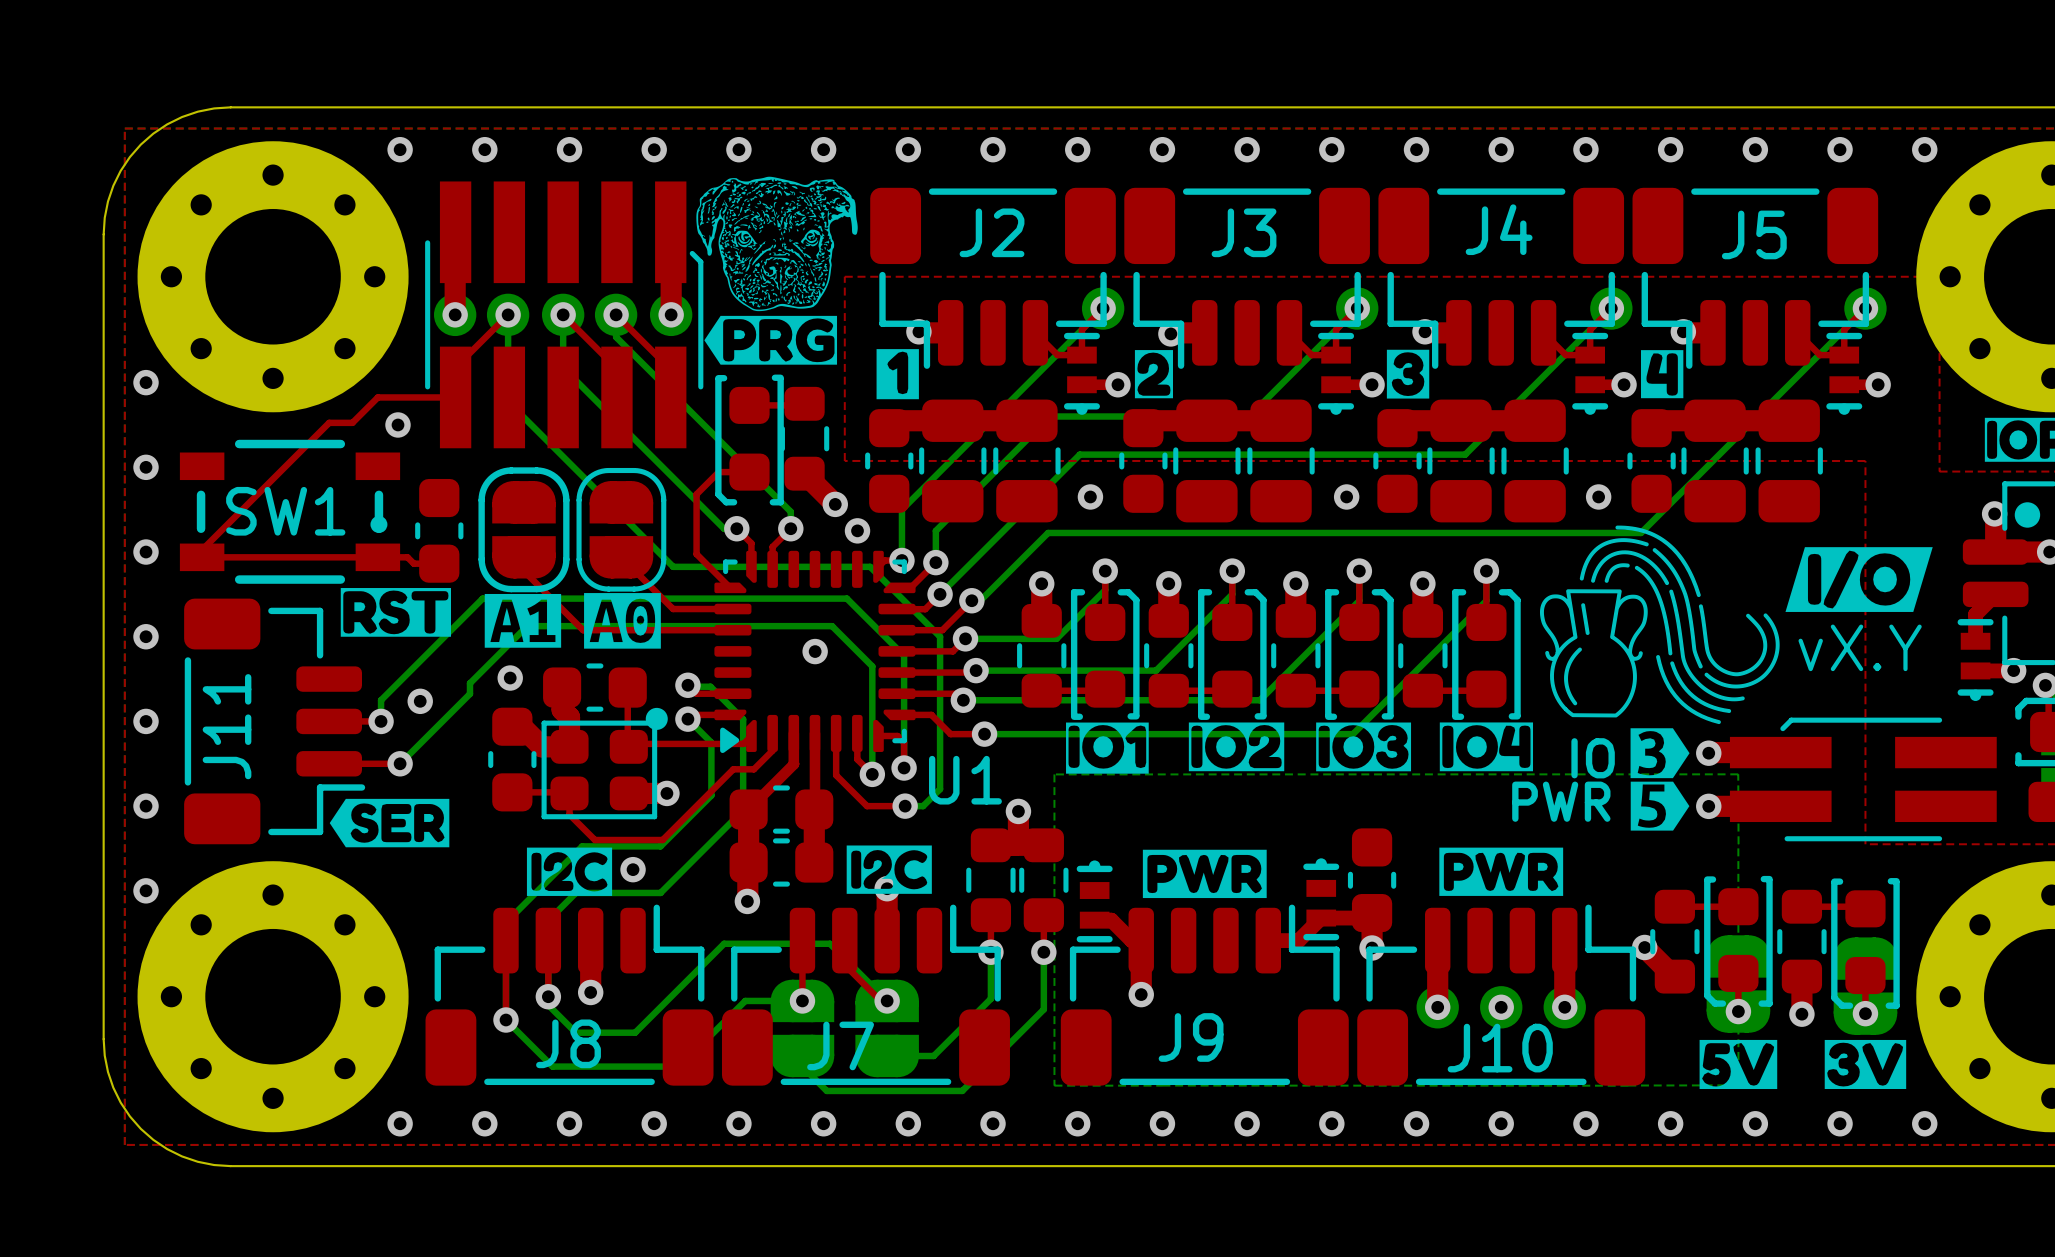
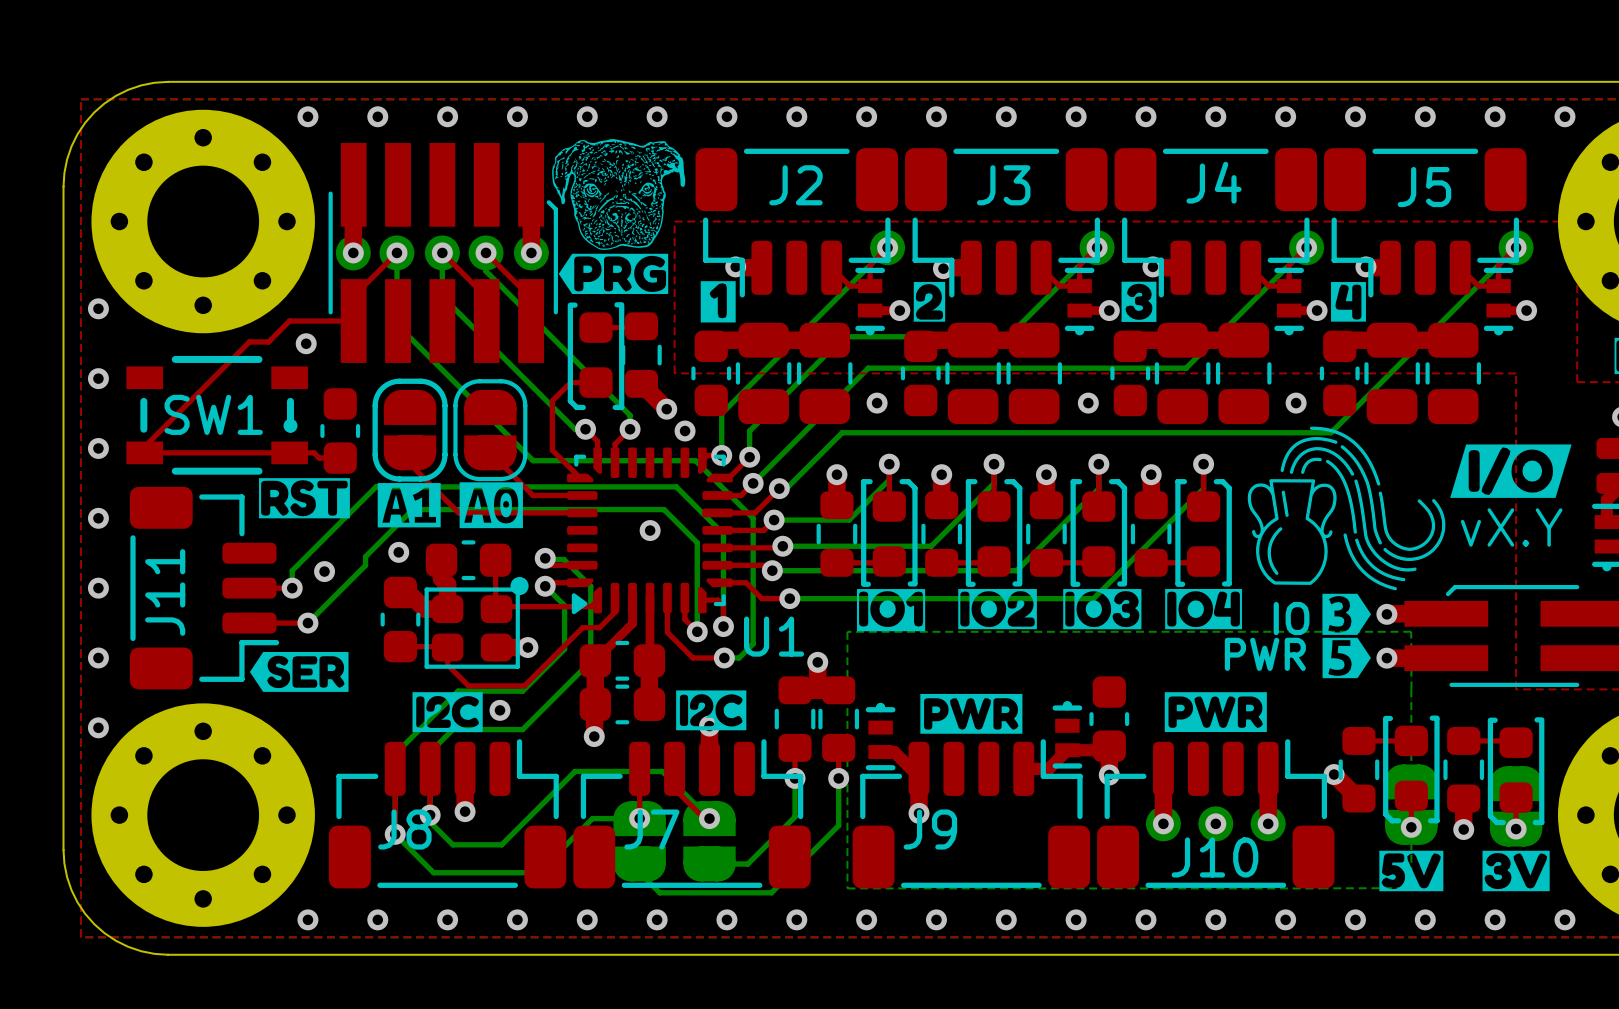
J9 name position: J9 (1191, 1037) -> J9 (930, 829)
J8 name position: J8 (568, 1043) -> J8 (404, 829)
J7 name position: J7 (840, 1045) -> J7 (651, 829)

